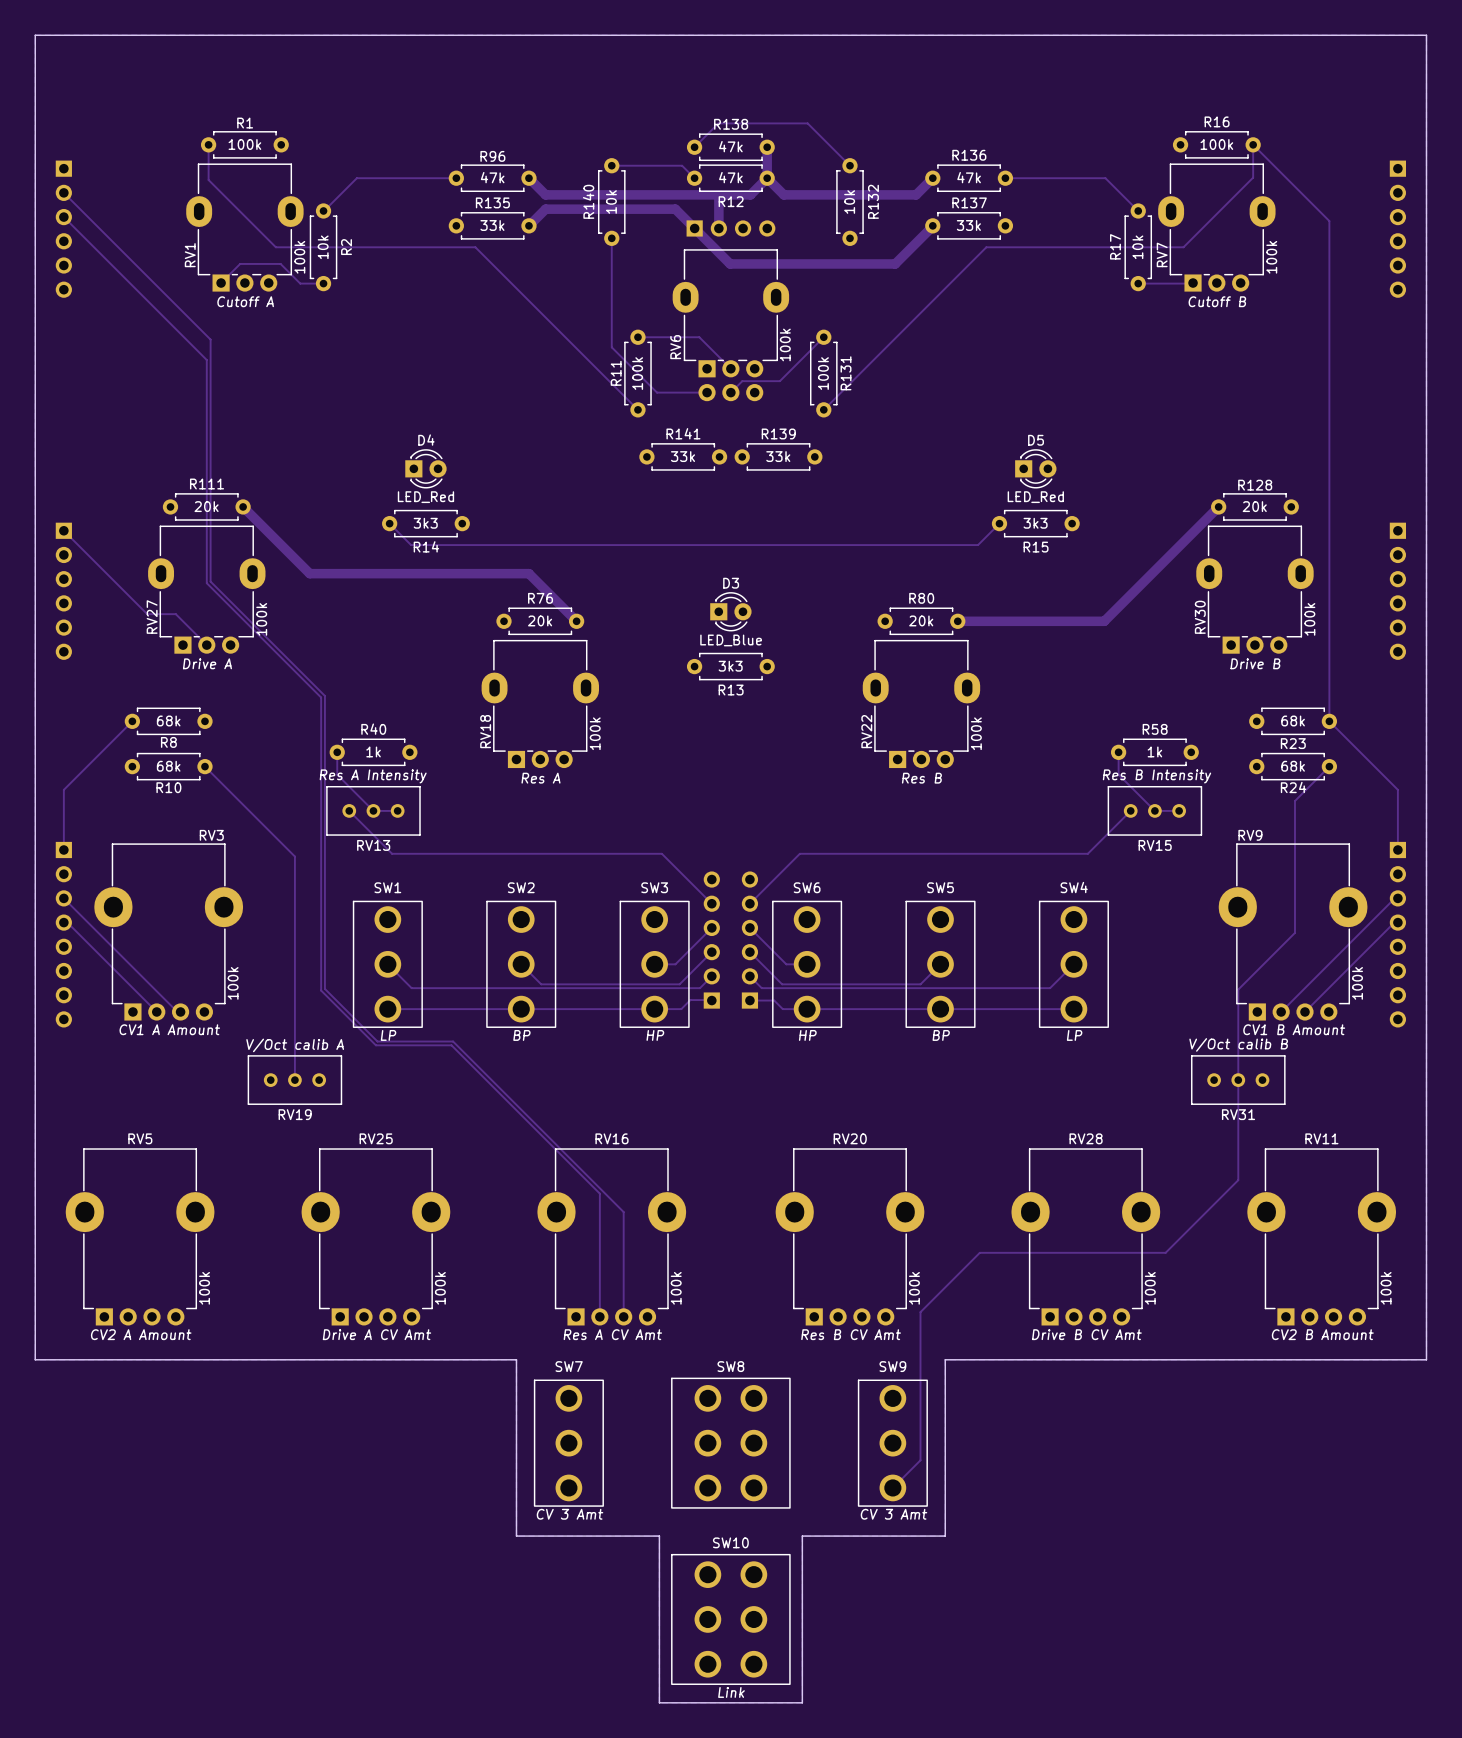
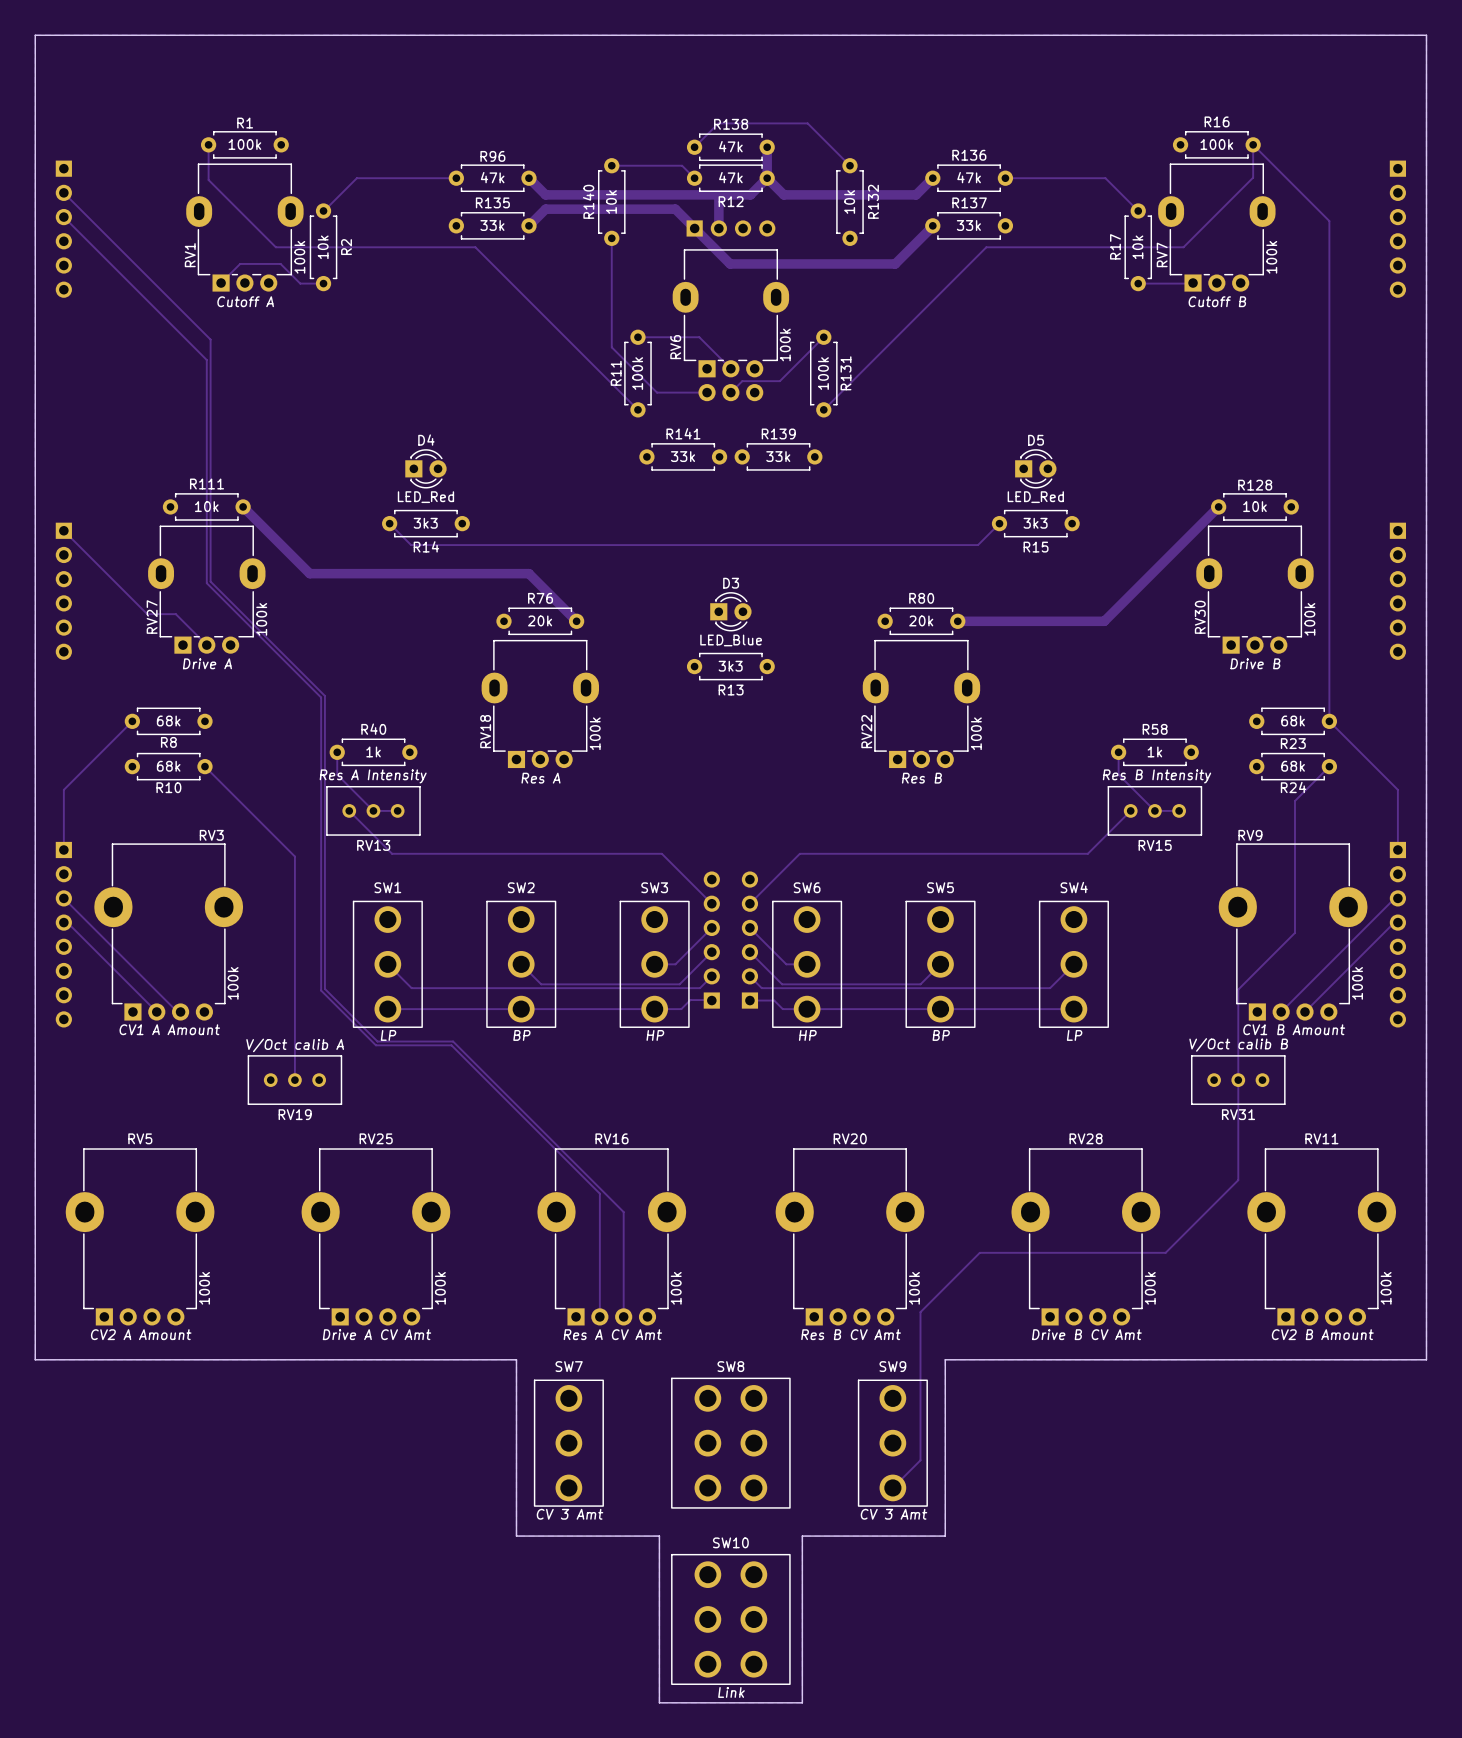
R111 value: 20k (206, 506) -> 10k (206, 506)
R128 value: 20k (1254, 506) -> 10k (1254, 506)

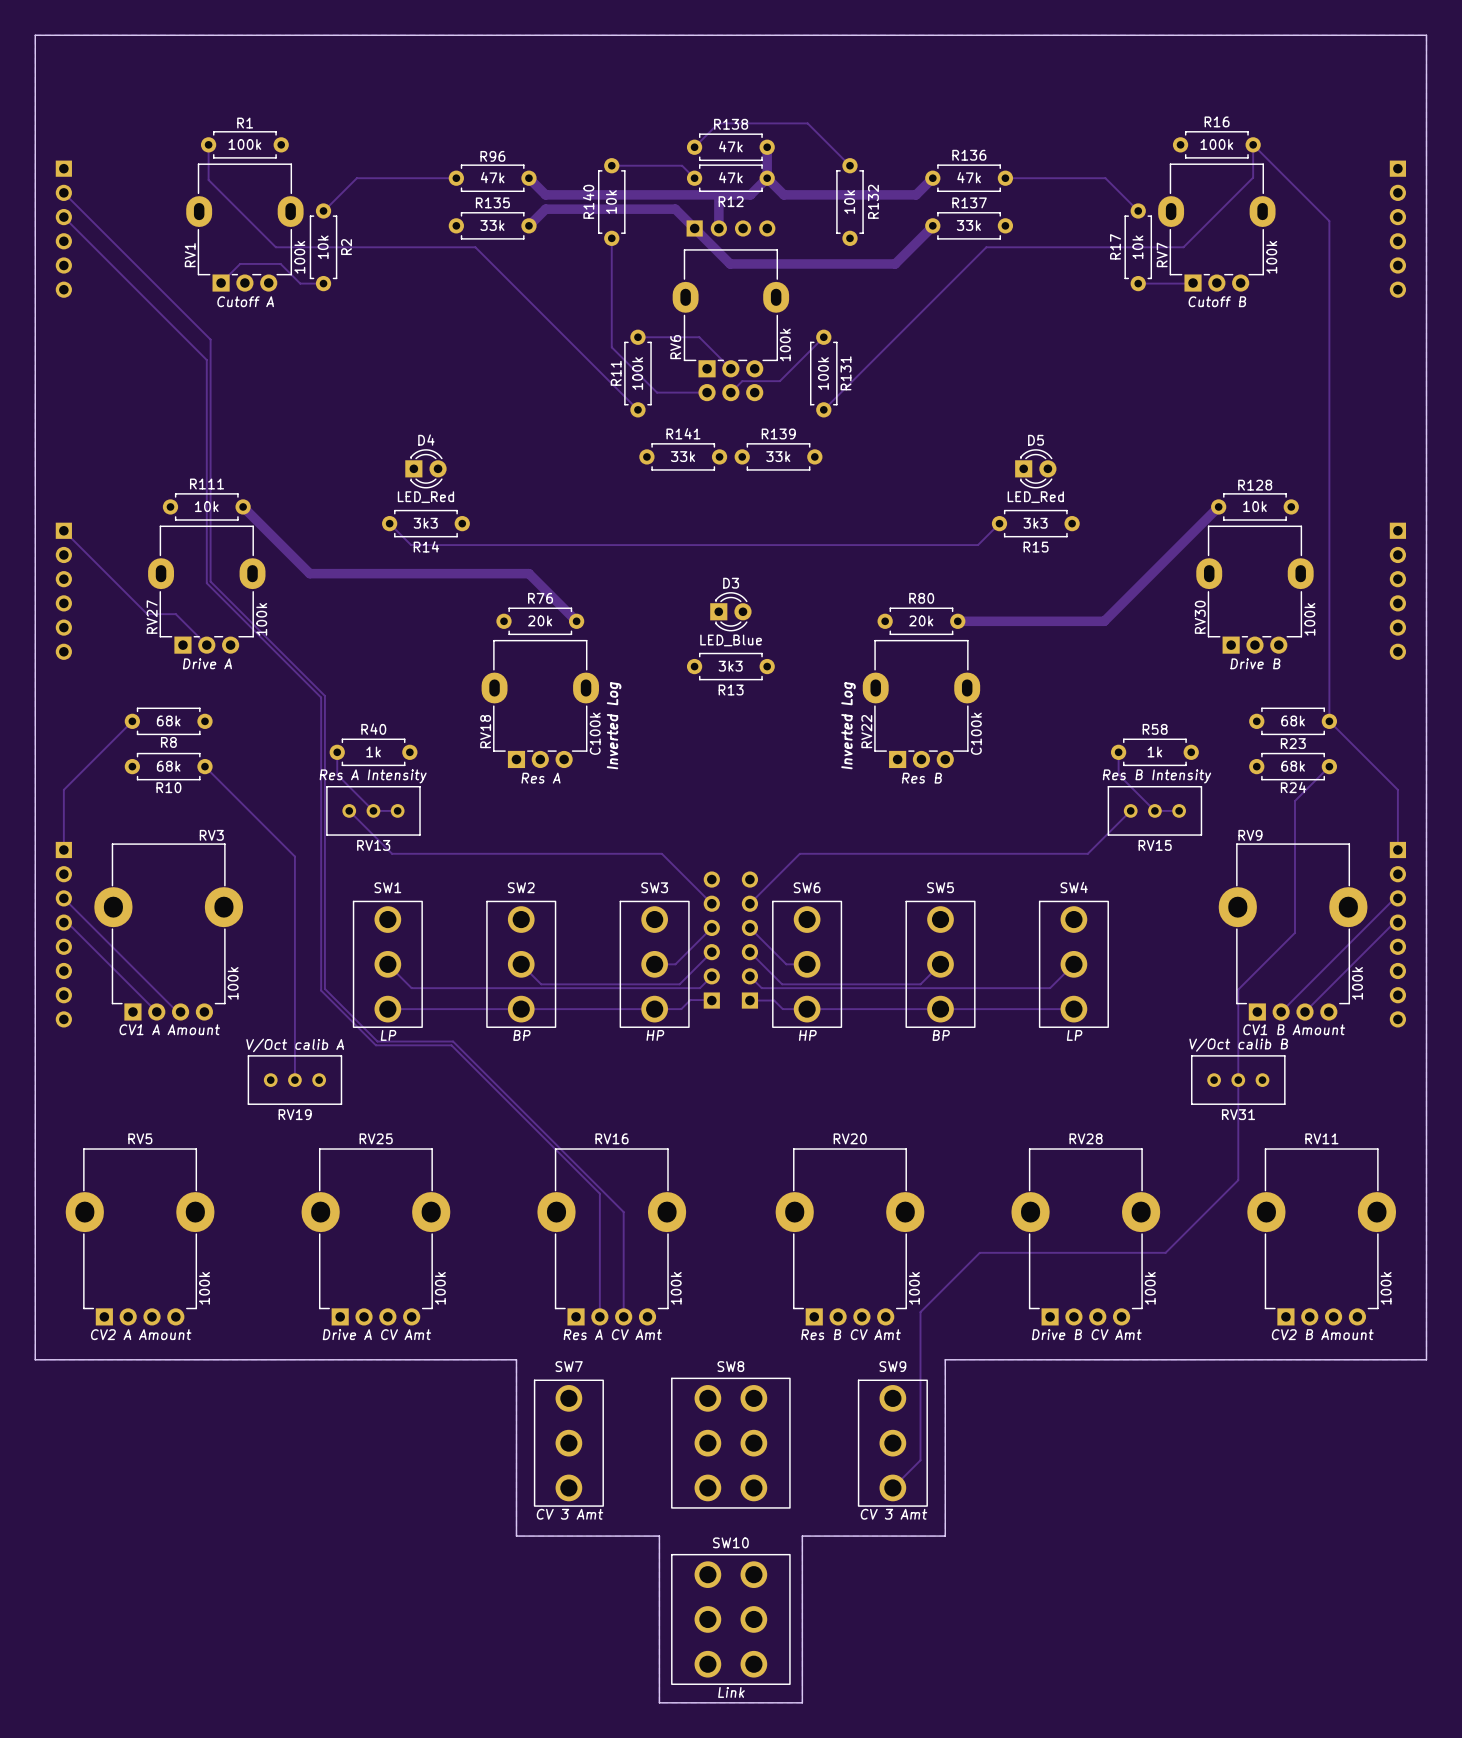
text: none -> Inverted Log (614, 725)
text: none -> Inverted Log (848, 725)
RV18 value: 100k (595, 733) -> C100k (595, 733)
RV22 value: 100k (976, 733) -> C100k (976, 733)

